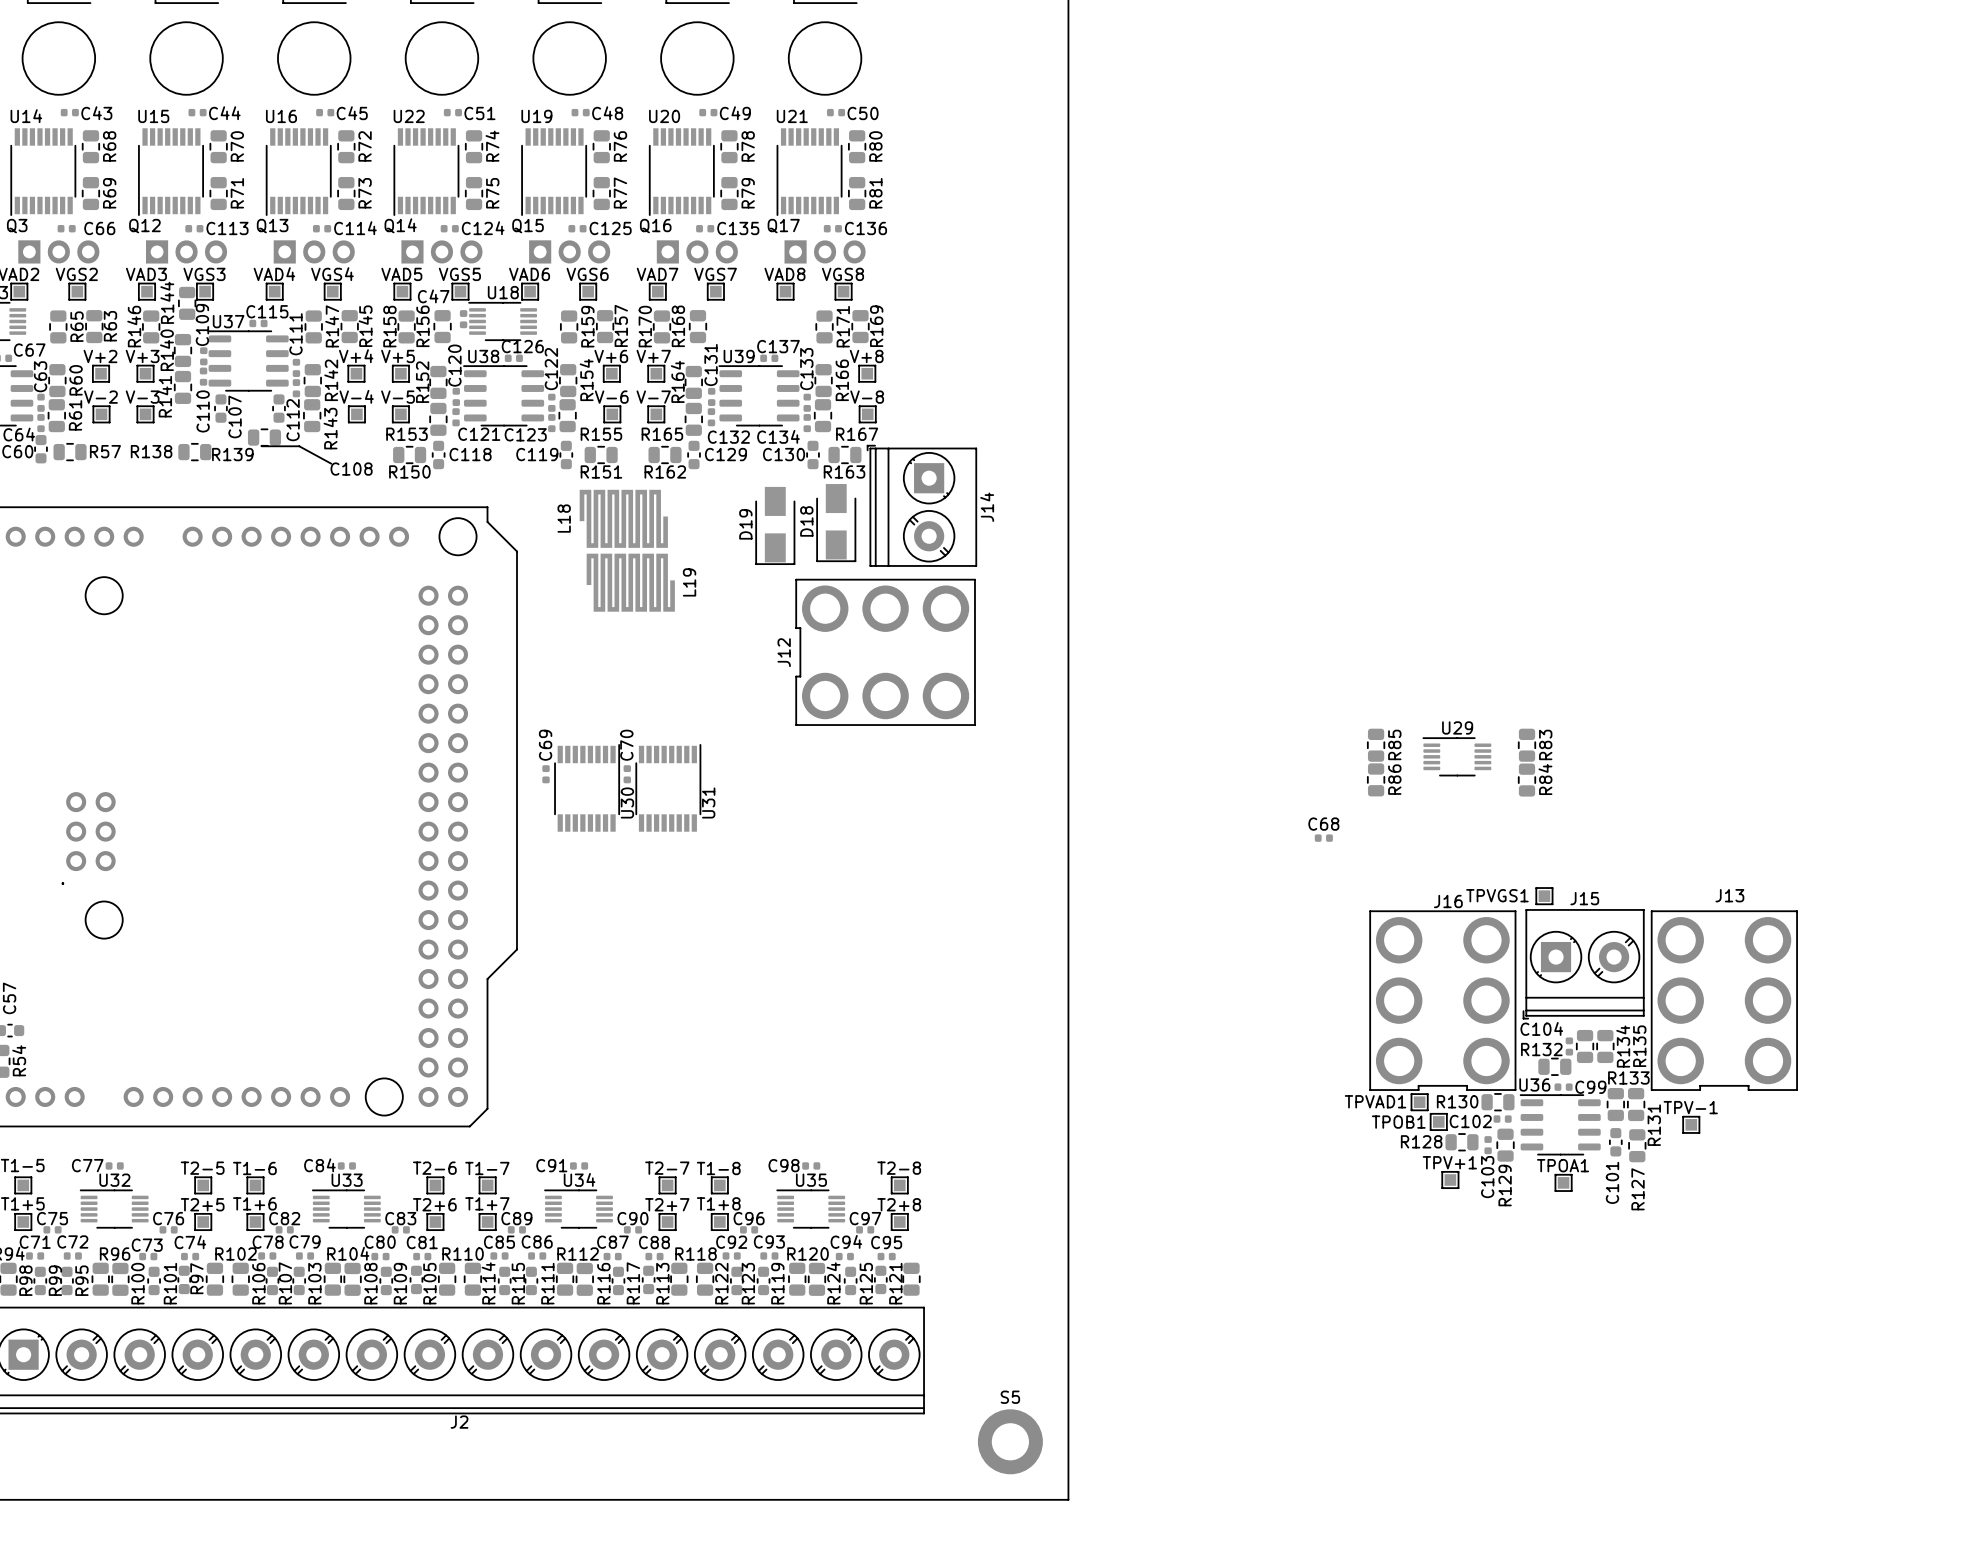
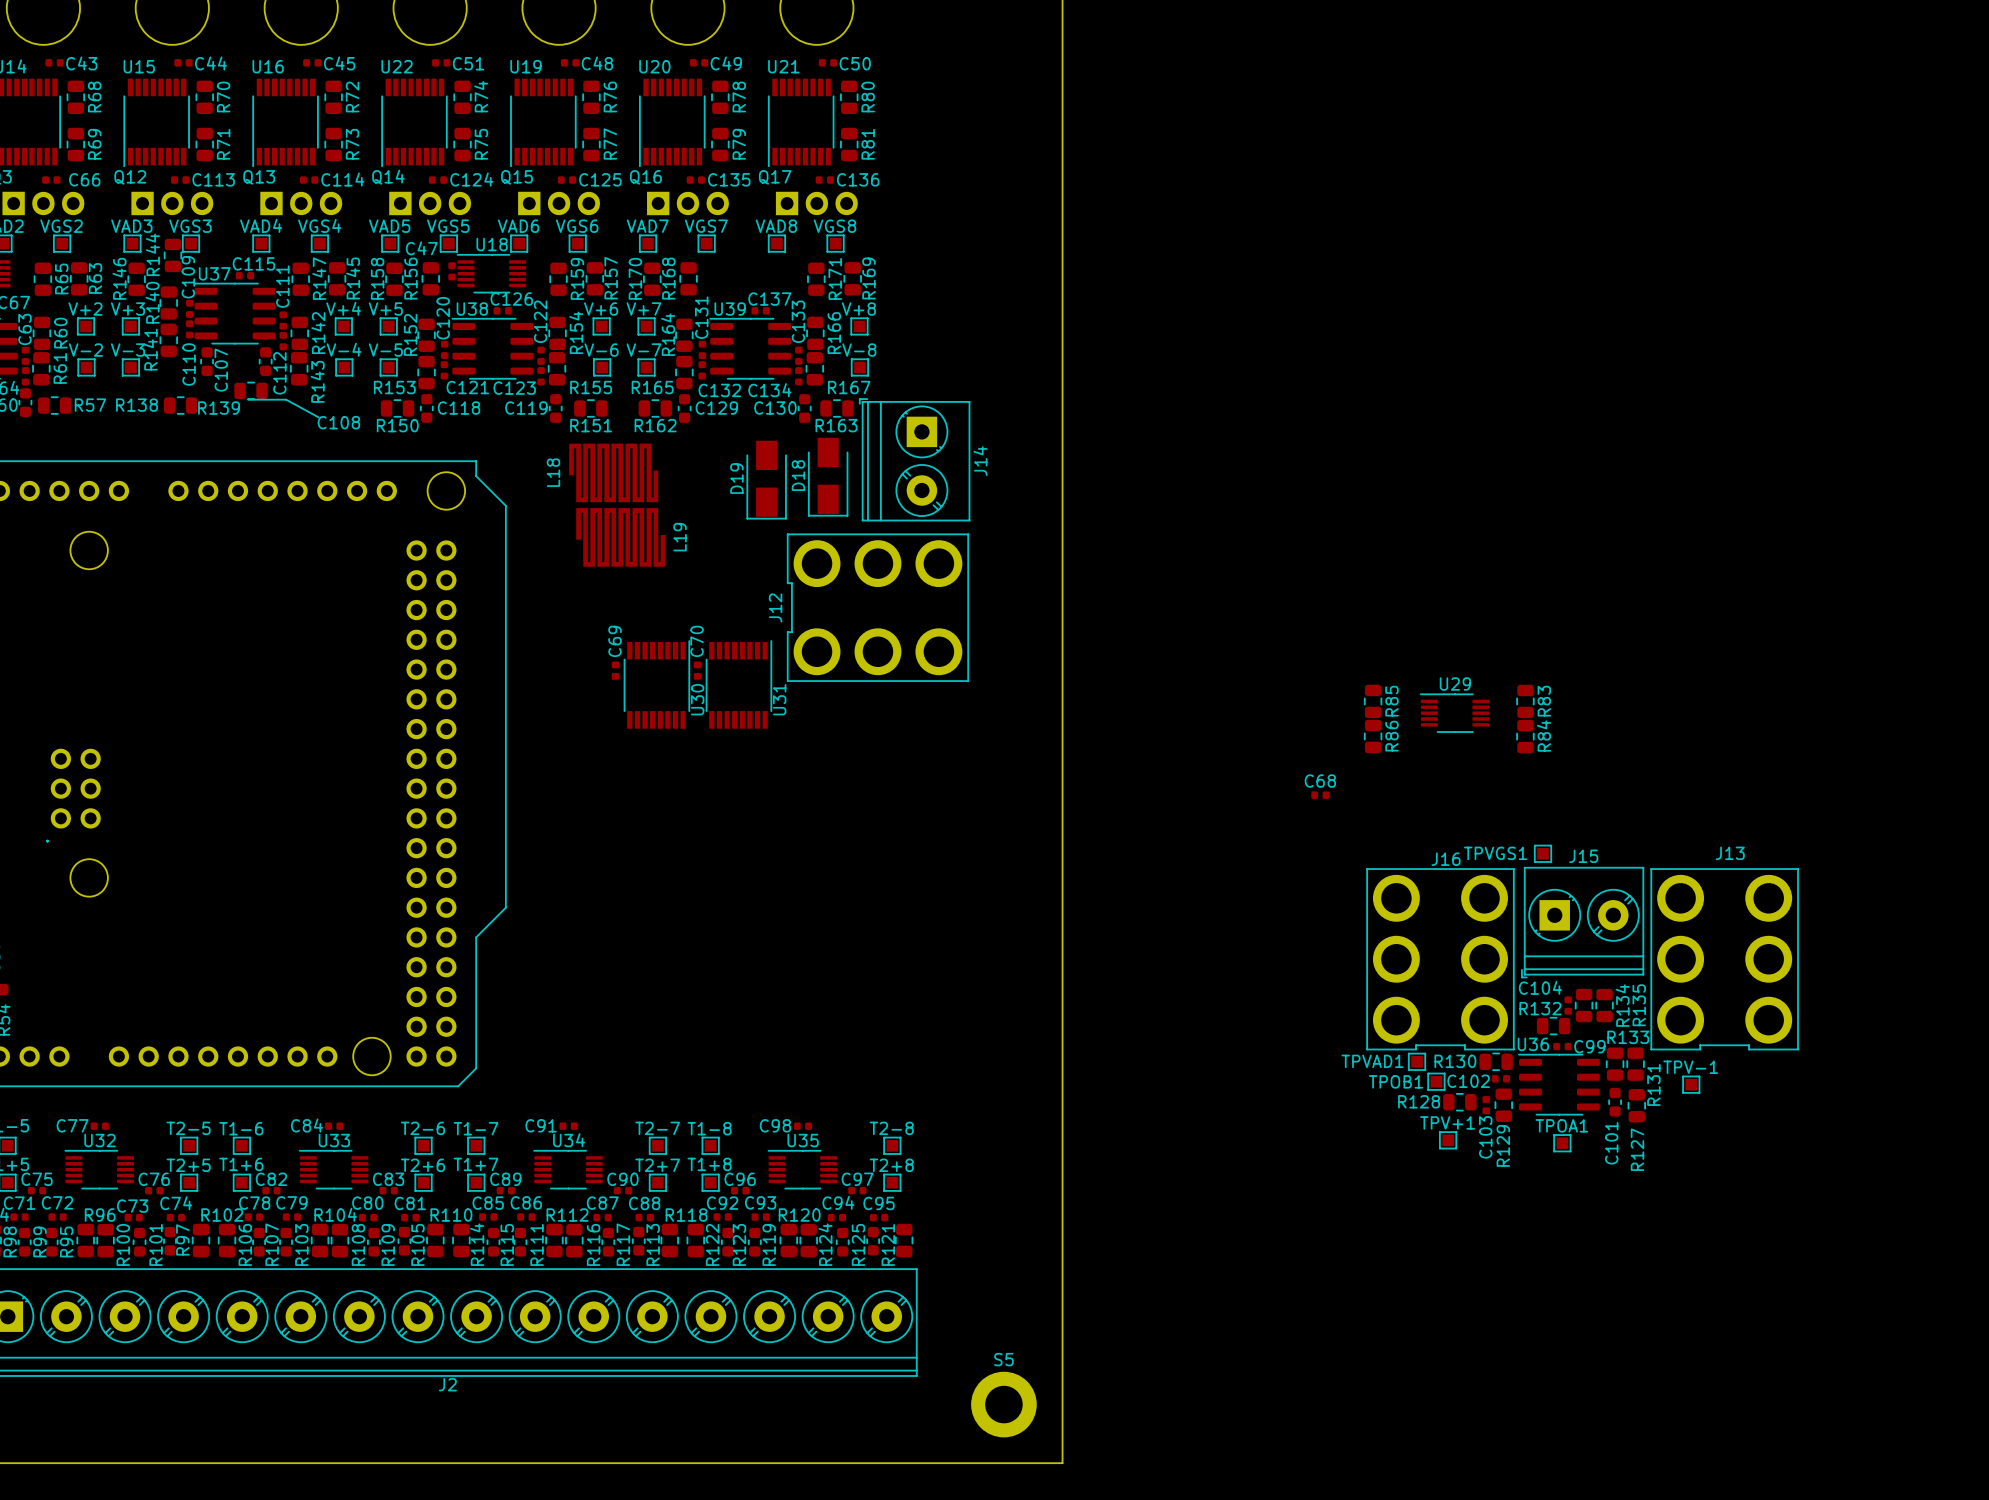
C69 position: (546, 774) -> (615, 670)
C70 position: (627, 774) -> (697, 670)
U30 position: (587, 787) -> (656, 684)
U31 position: (668, 787) -> (738, 684)

